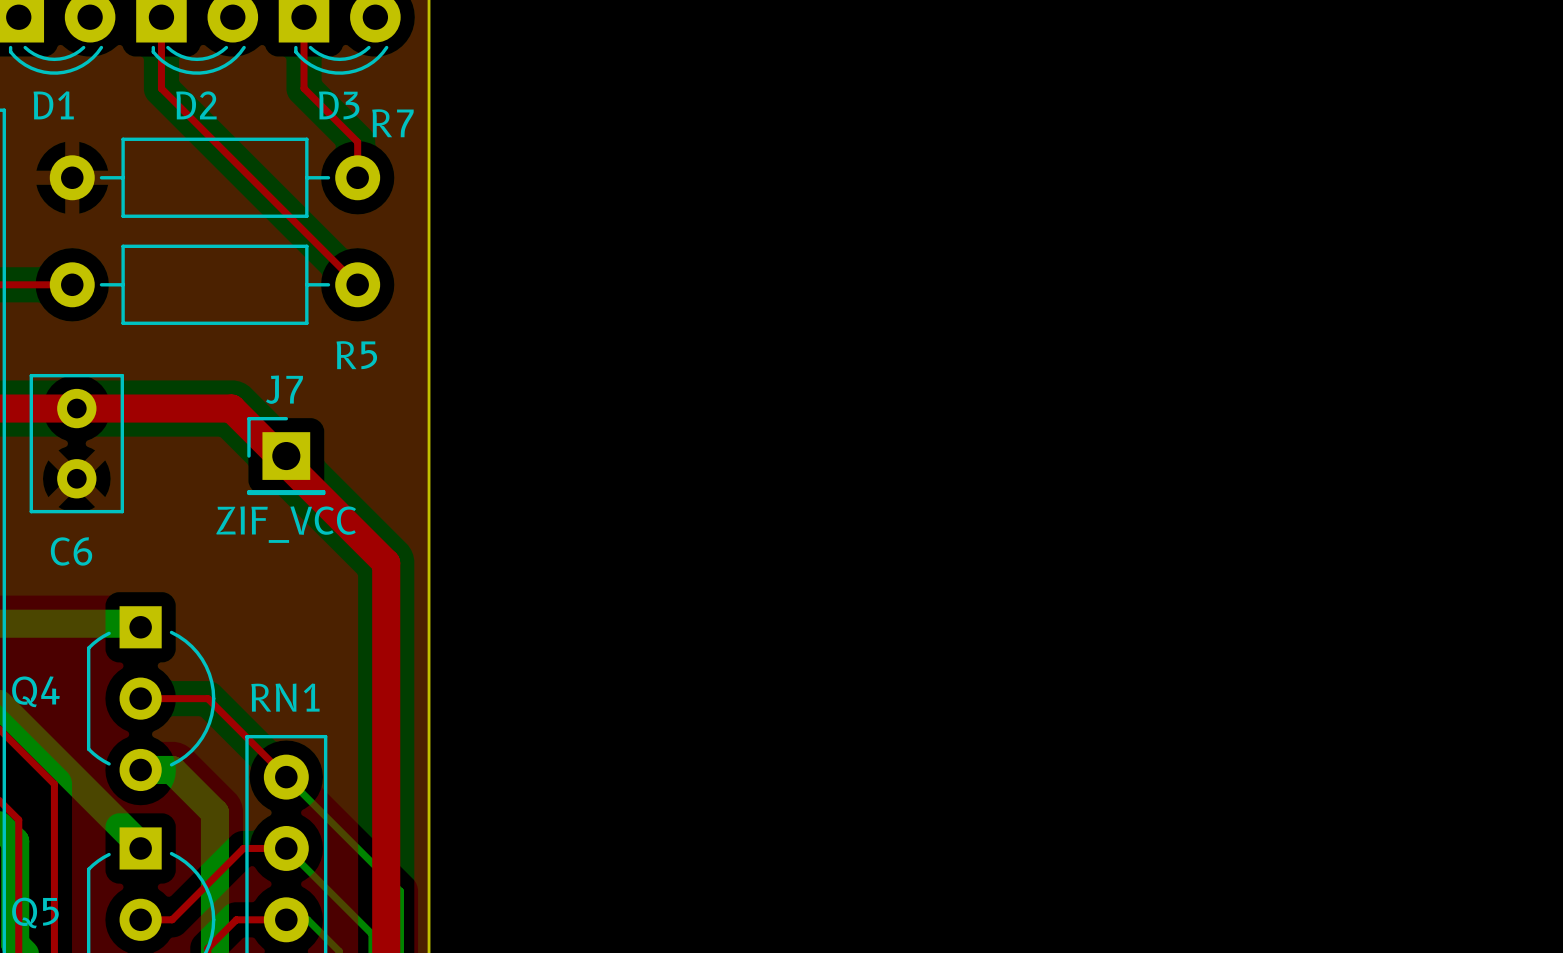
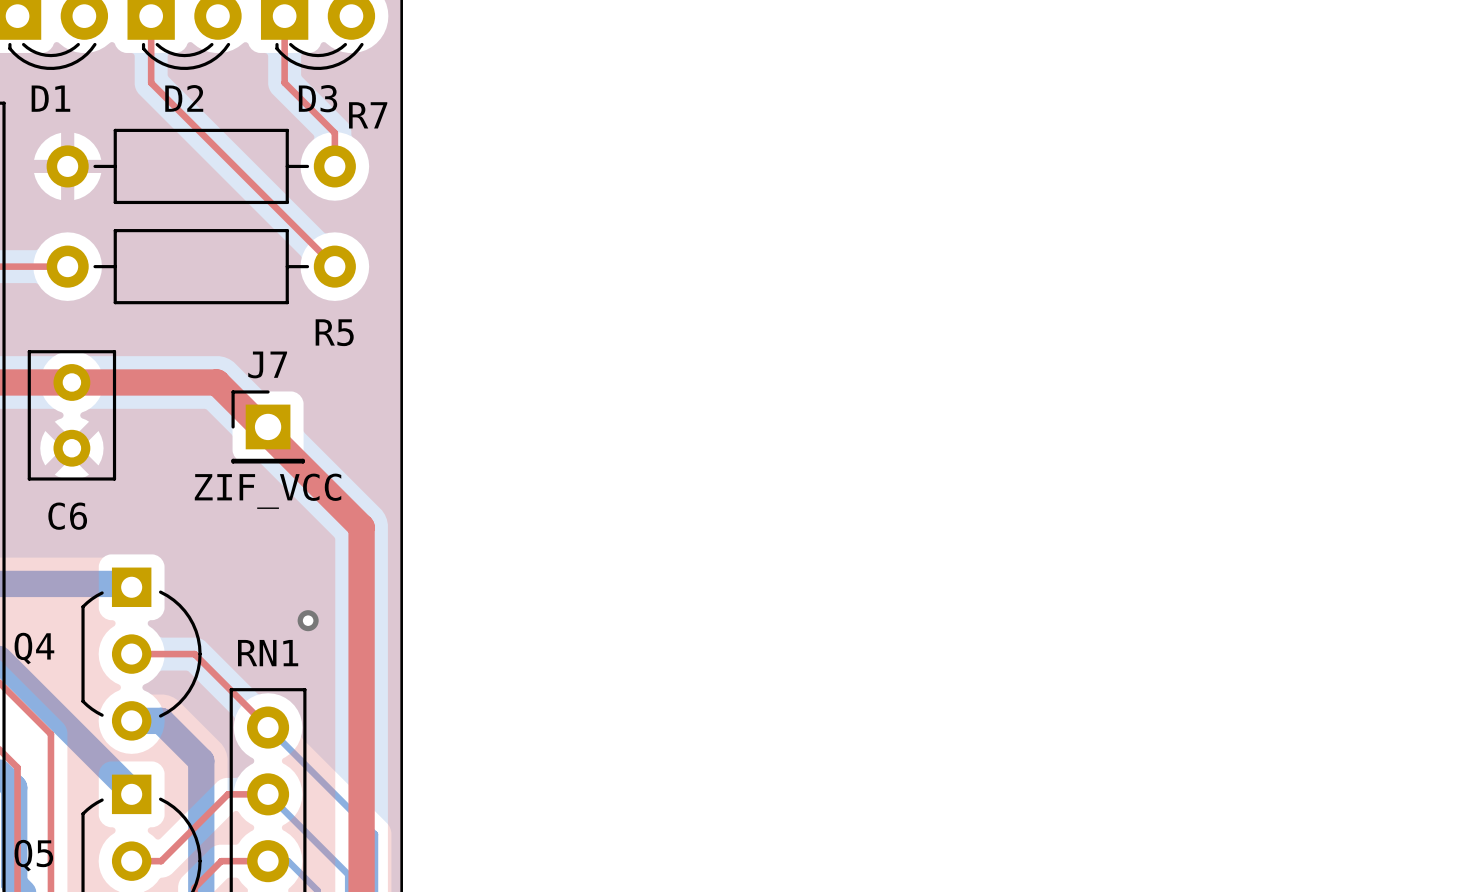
via: none -> (308, 620)

